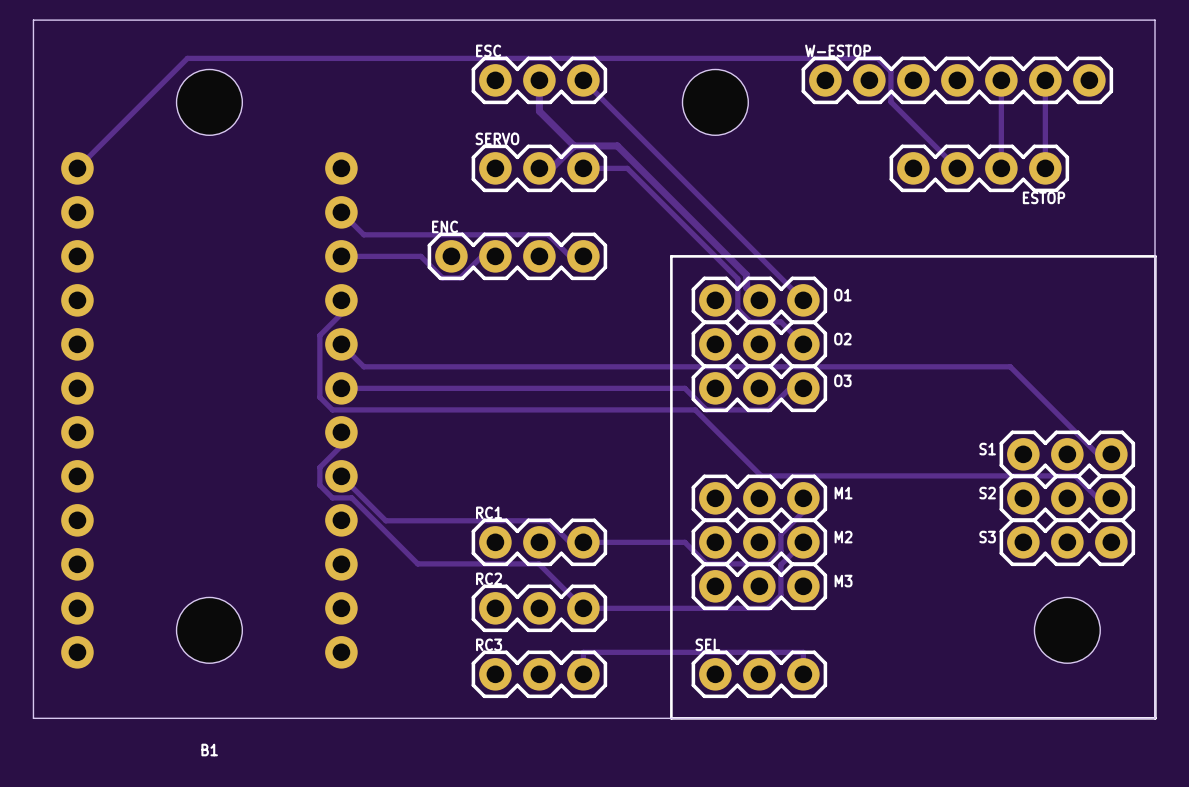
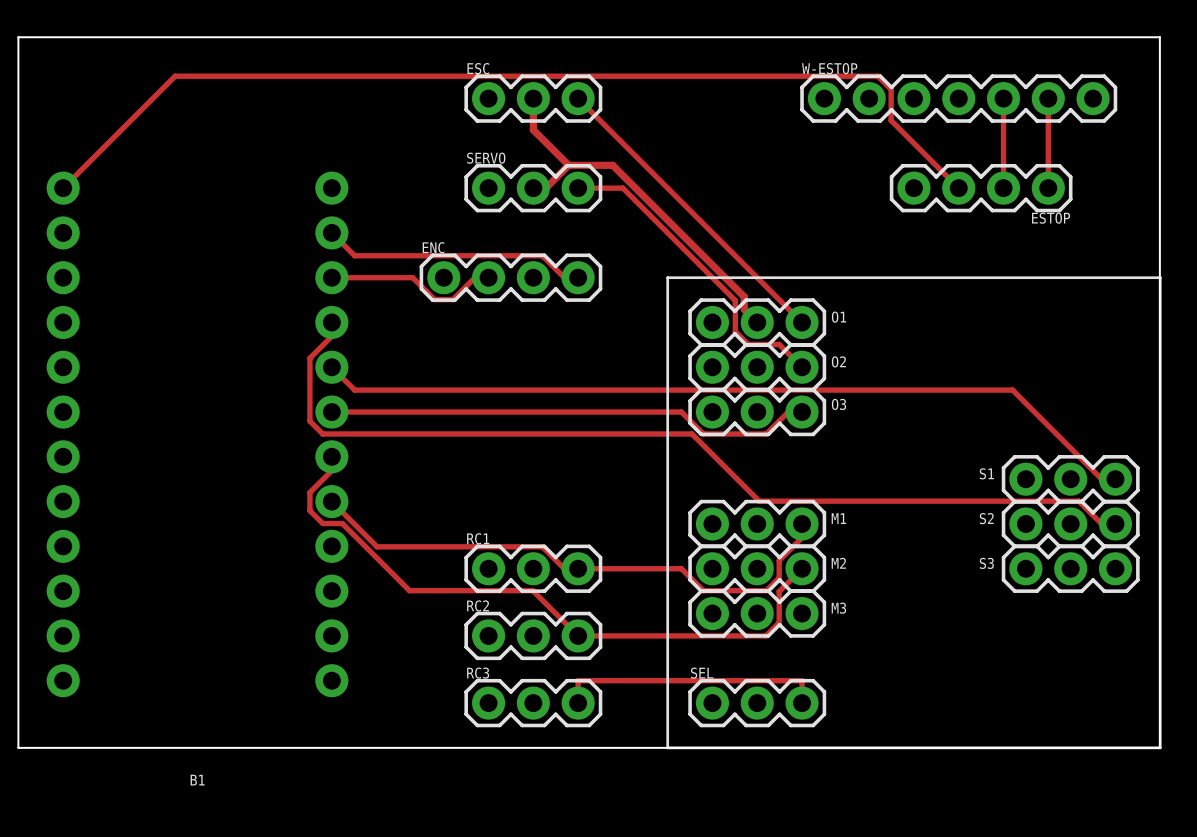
hole: (209, 102) -> none
hole: (715, 102) -> none
hole: (209, 630) -> none
hole: (1067, 630) -> none

